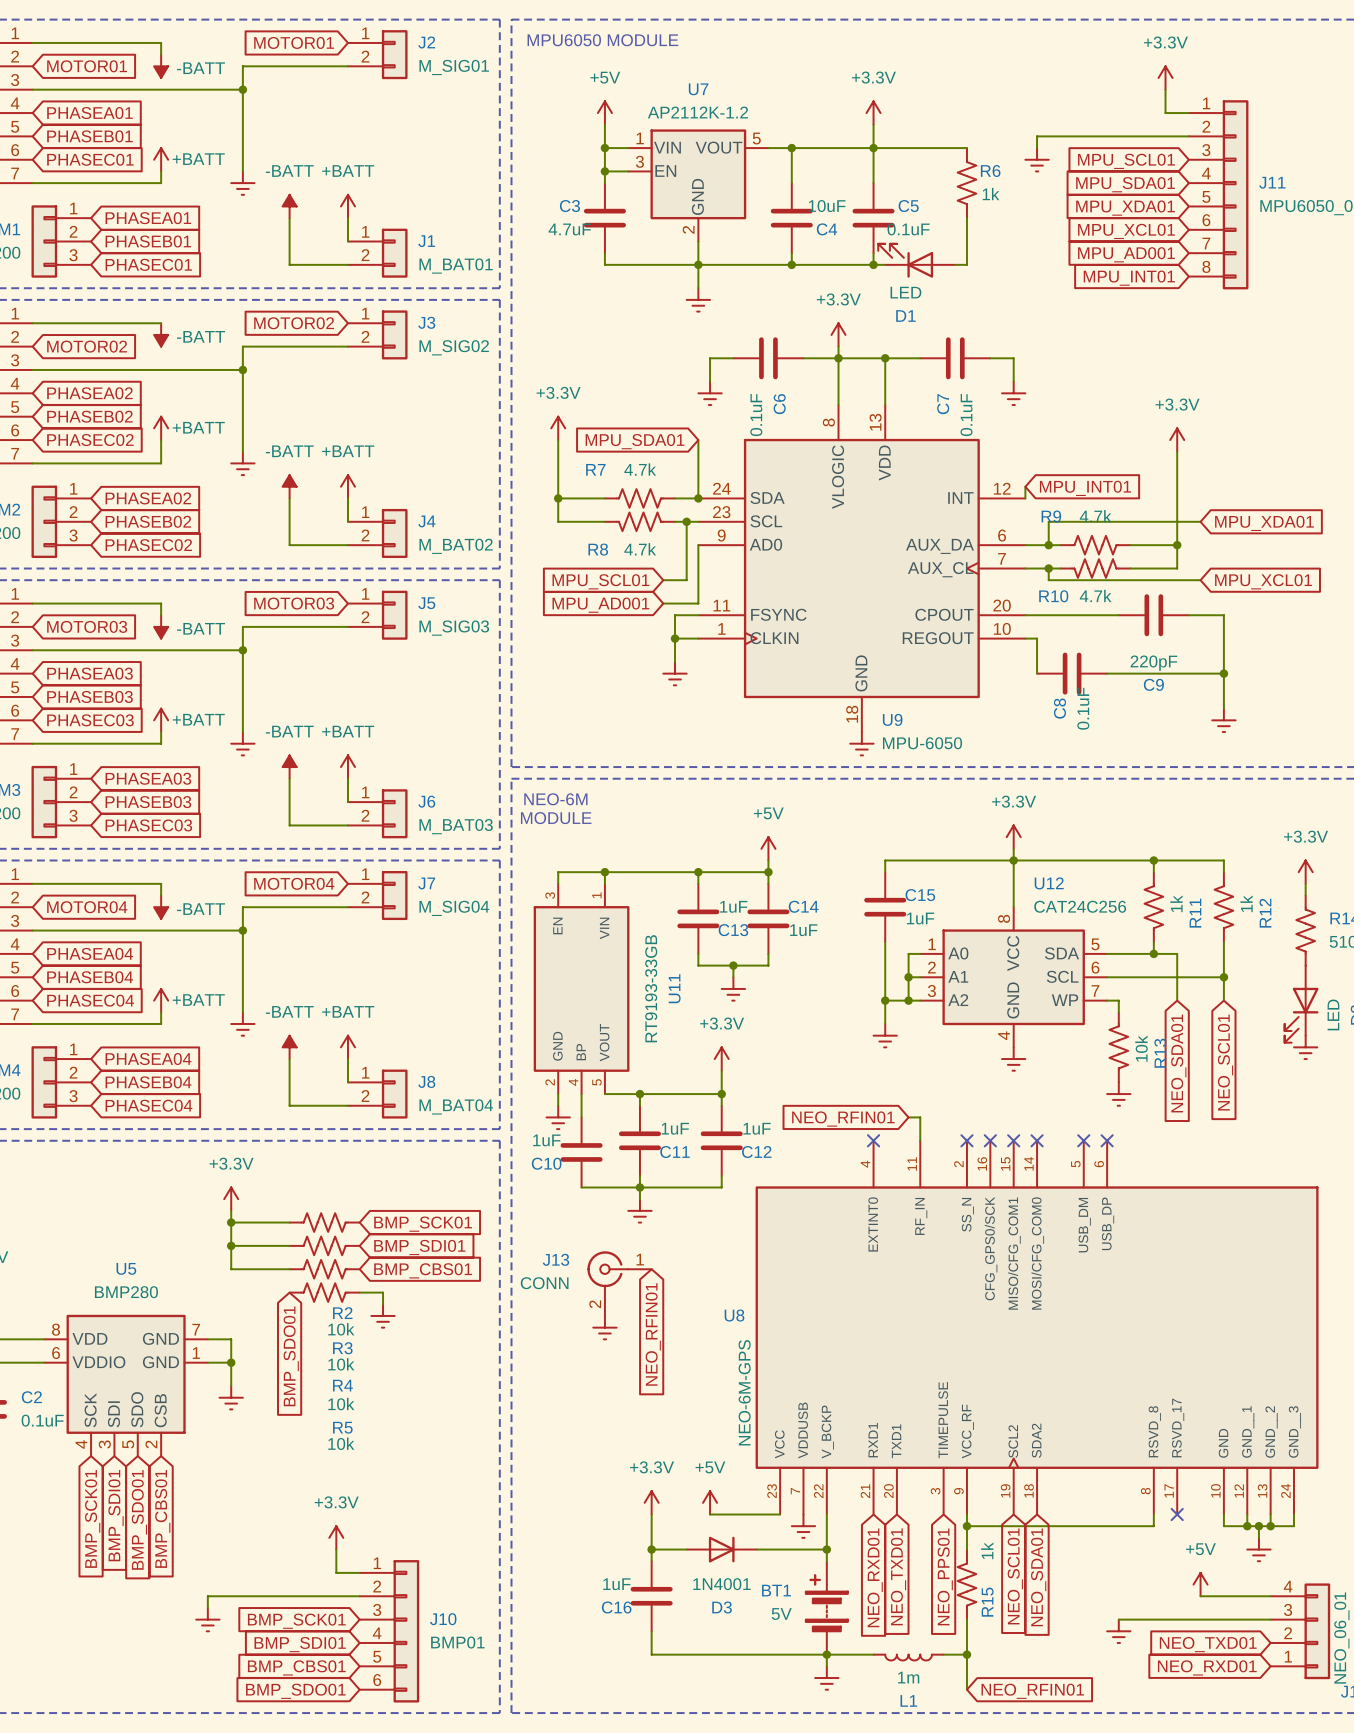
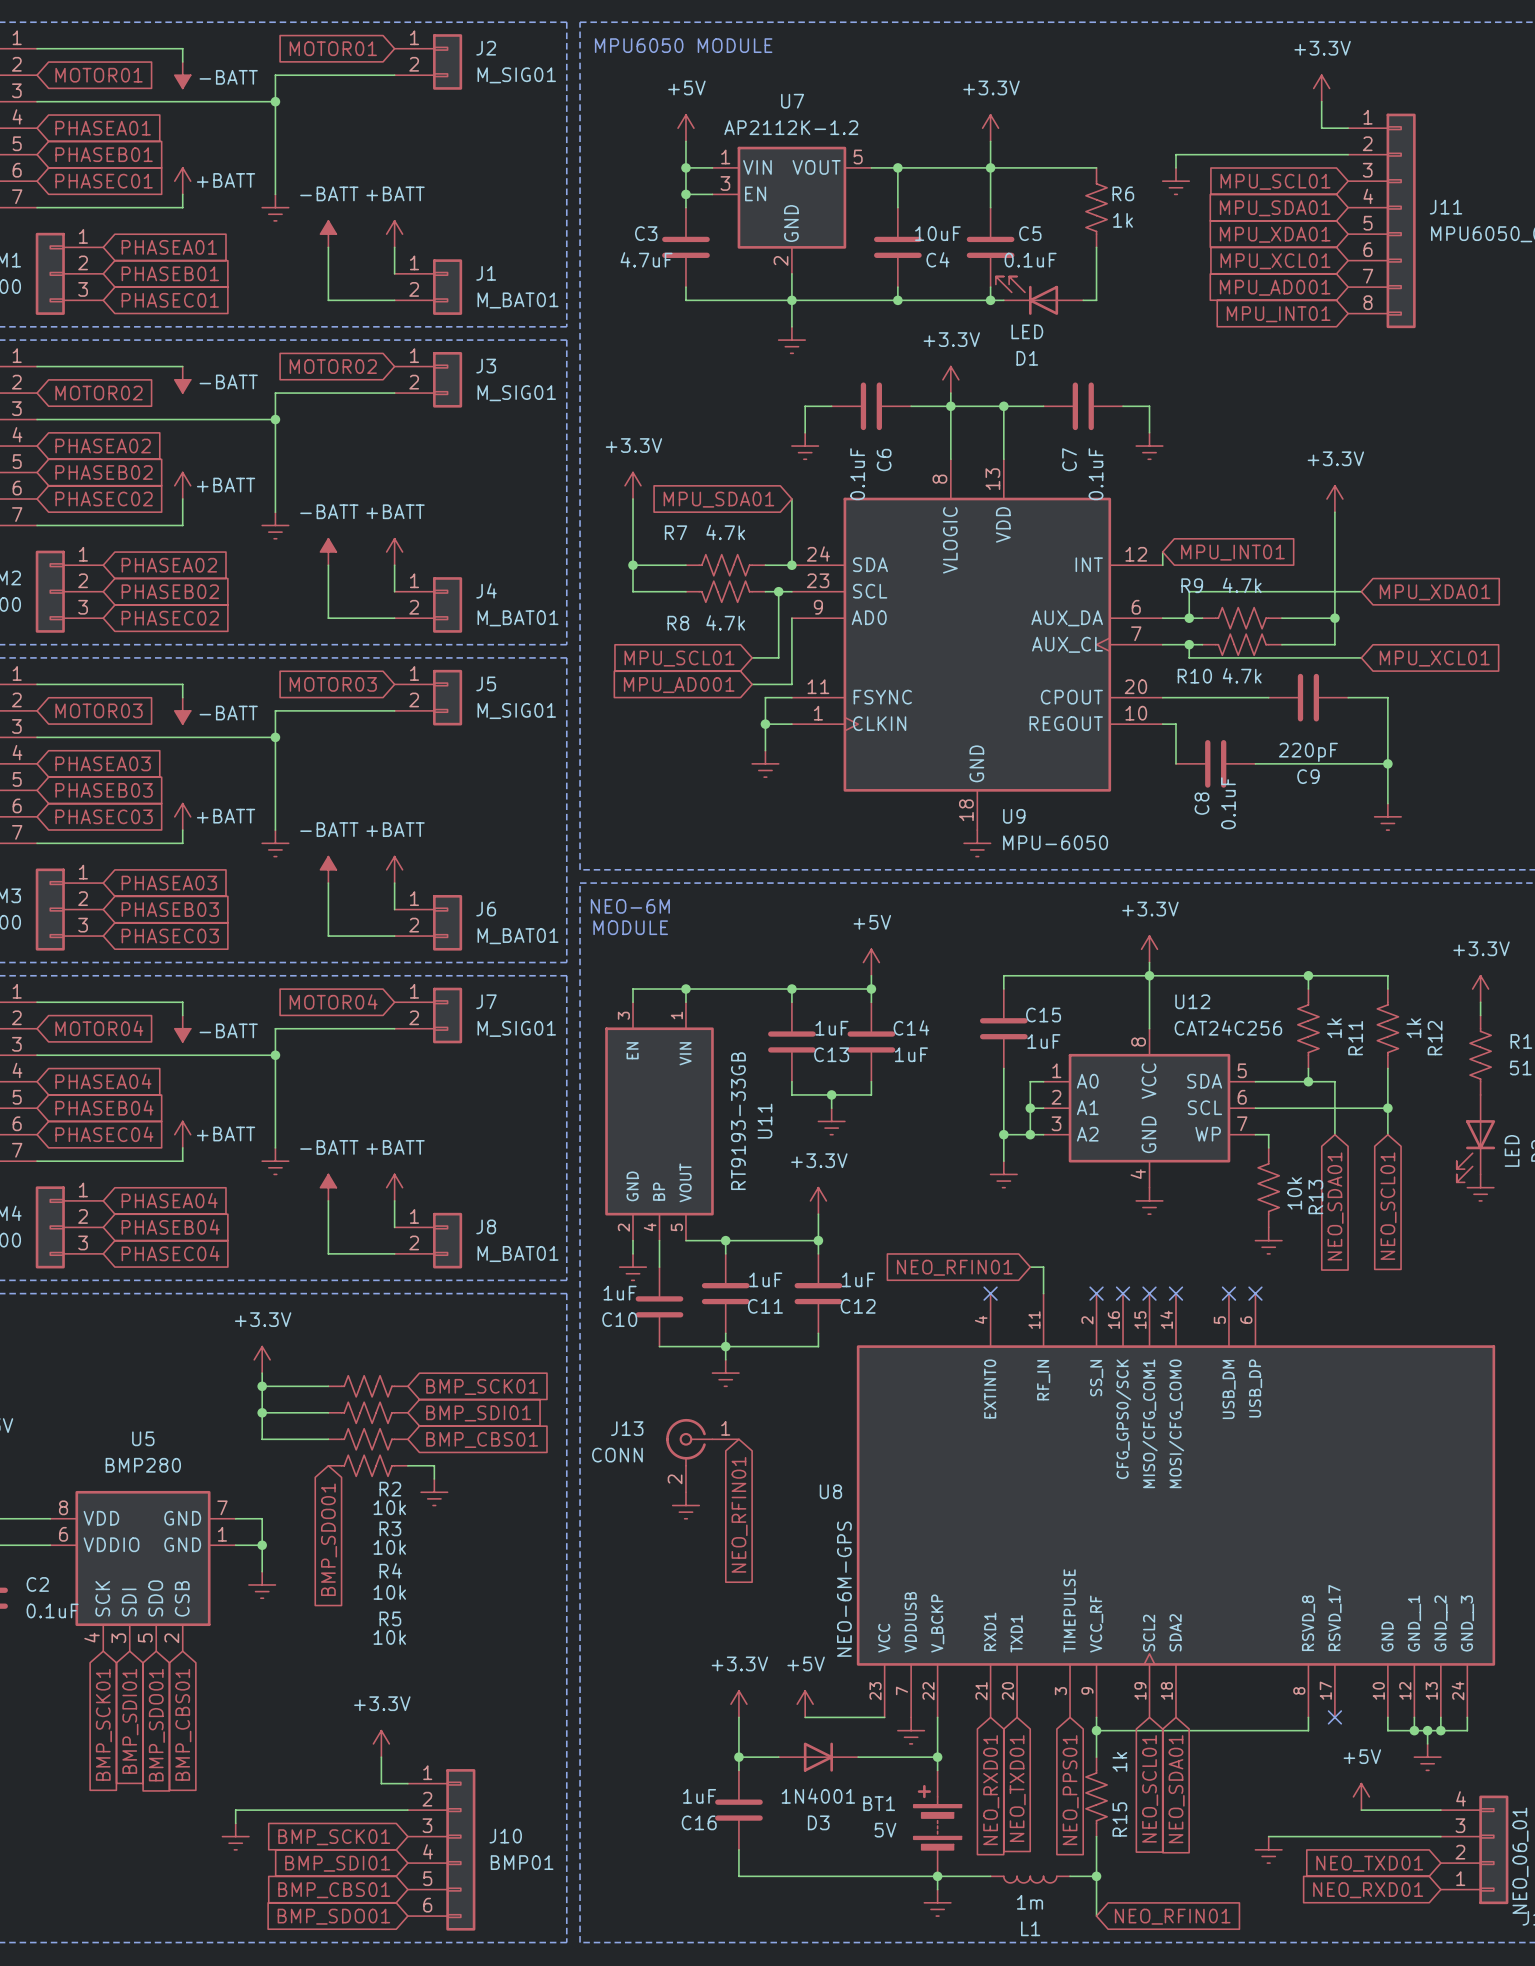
J3 value: M_SIG02 (454, 347) -> M_SIG01 (516, 393)
J4 value: M_BAT02 (456, 546) -> M_BAT01 (518, 618)
J5 value: M_SIG03 (454, 628) -> M_SIG01 (516, 711)
J6 value: M_BAT03 (456, 826) -> M_BAT01 (518, 936)
J7 value: M_SIG04 (454, 908) -> M_SIG01 (516, 1028)
J8 value: M_BAT04 (456, 1106) -> M_BAT01 (518, 1254)

